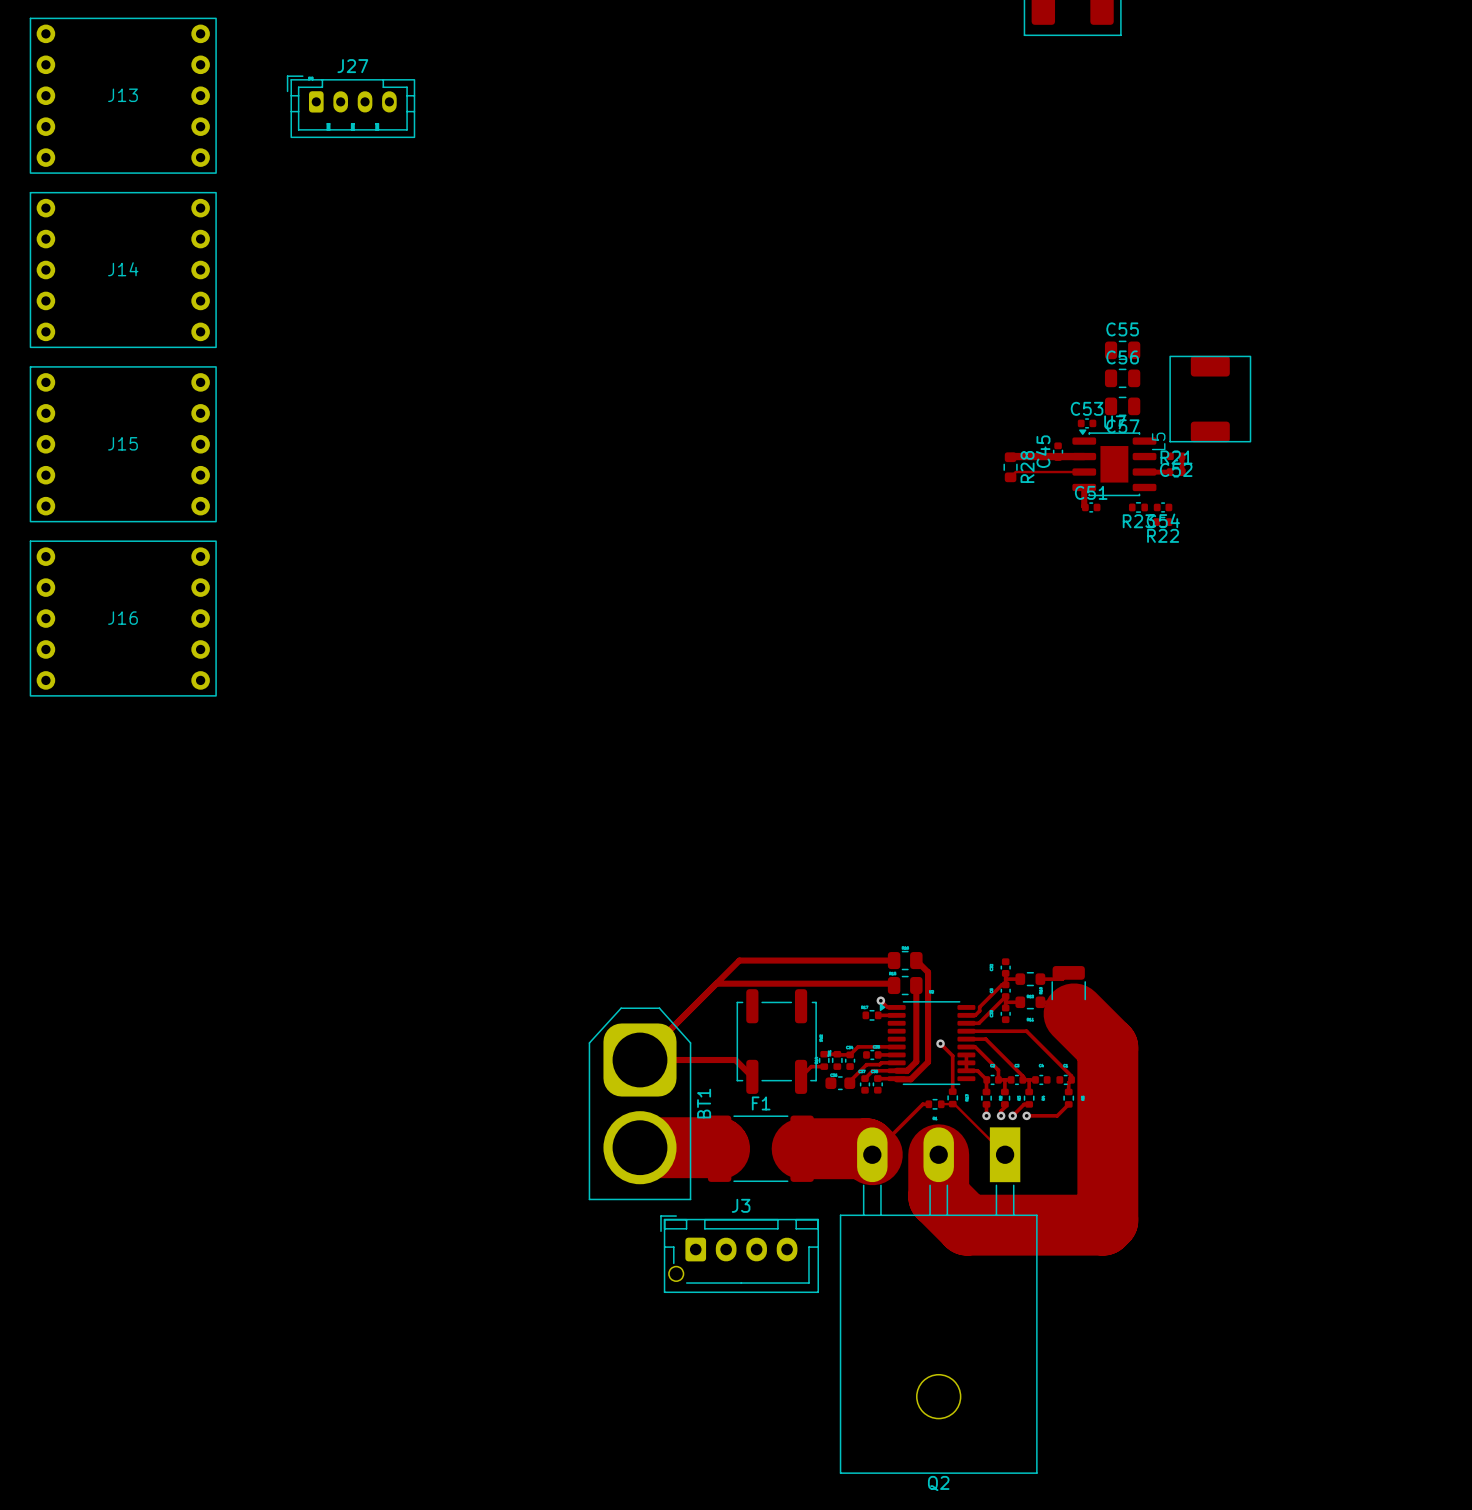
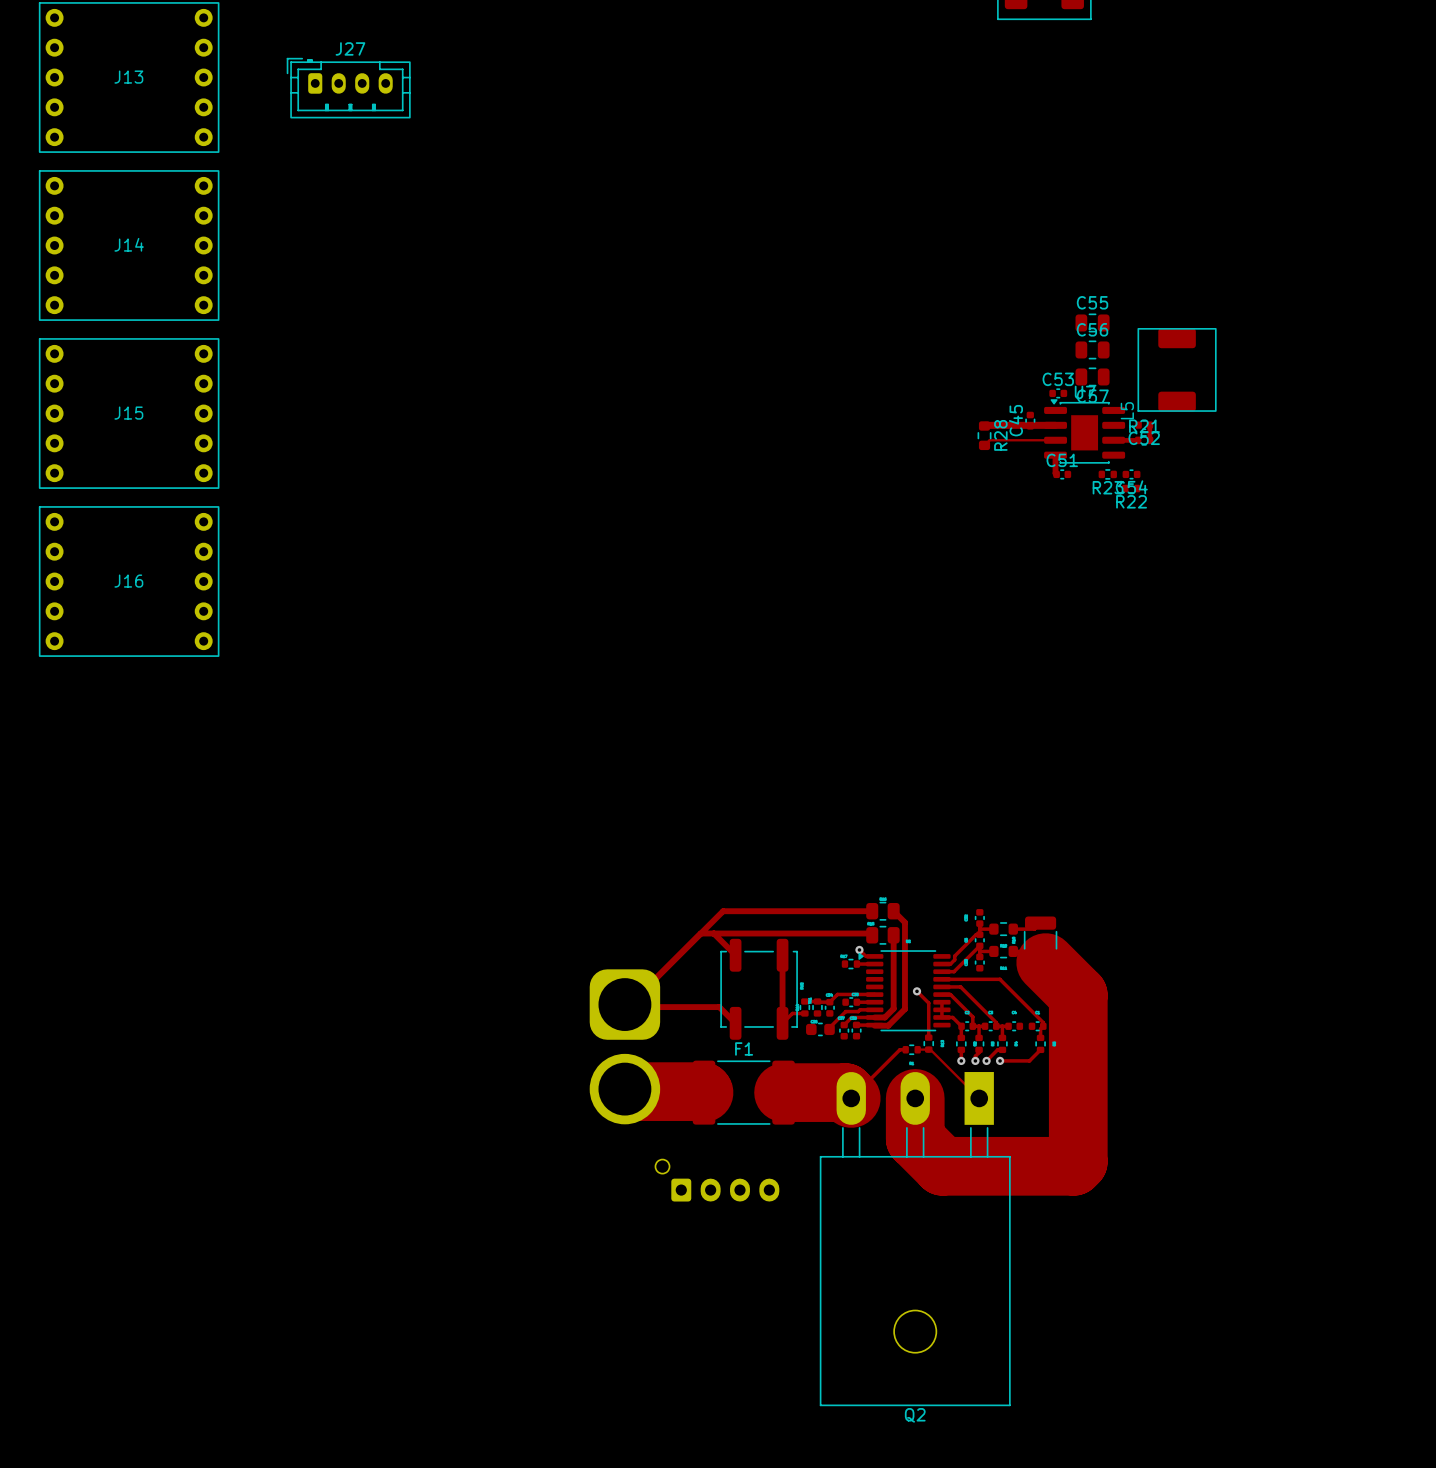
track: none -> (713, 933) (735, 955)
track: none -> (782, 955) (782, 1023)
BT1 side: top (639, 1103) -> bottom (624, 1046)
J3 side: top (739, 1254) -> bottom (717, 1180)

